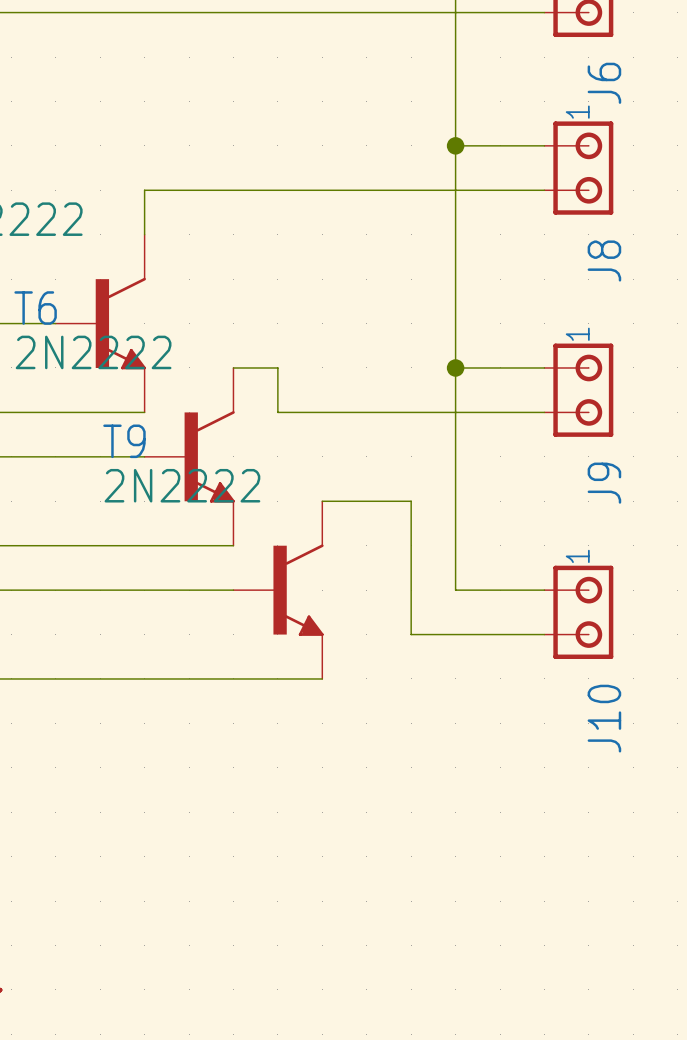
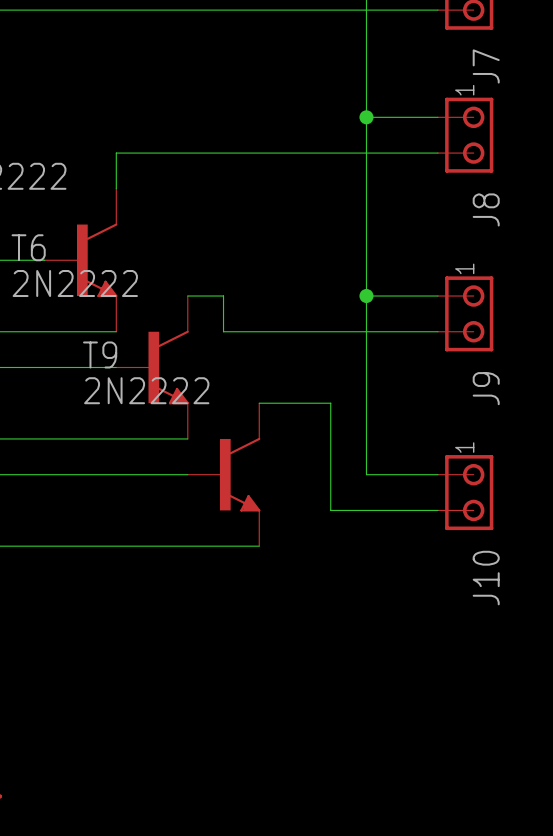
J6 name: J6 (604, 83) -> J7 (486, 66)

